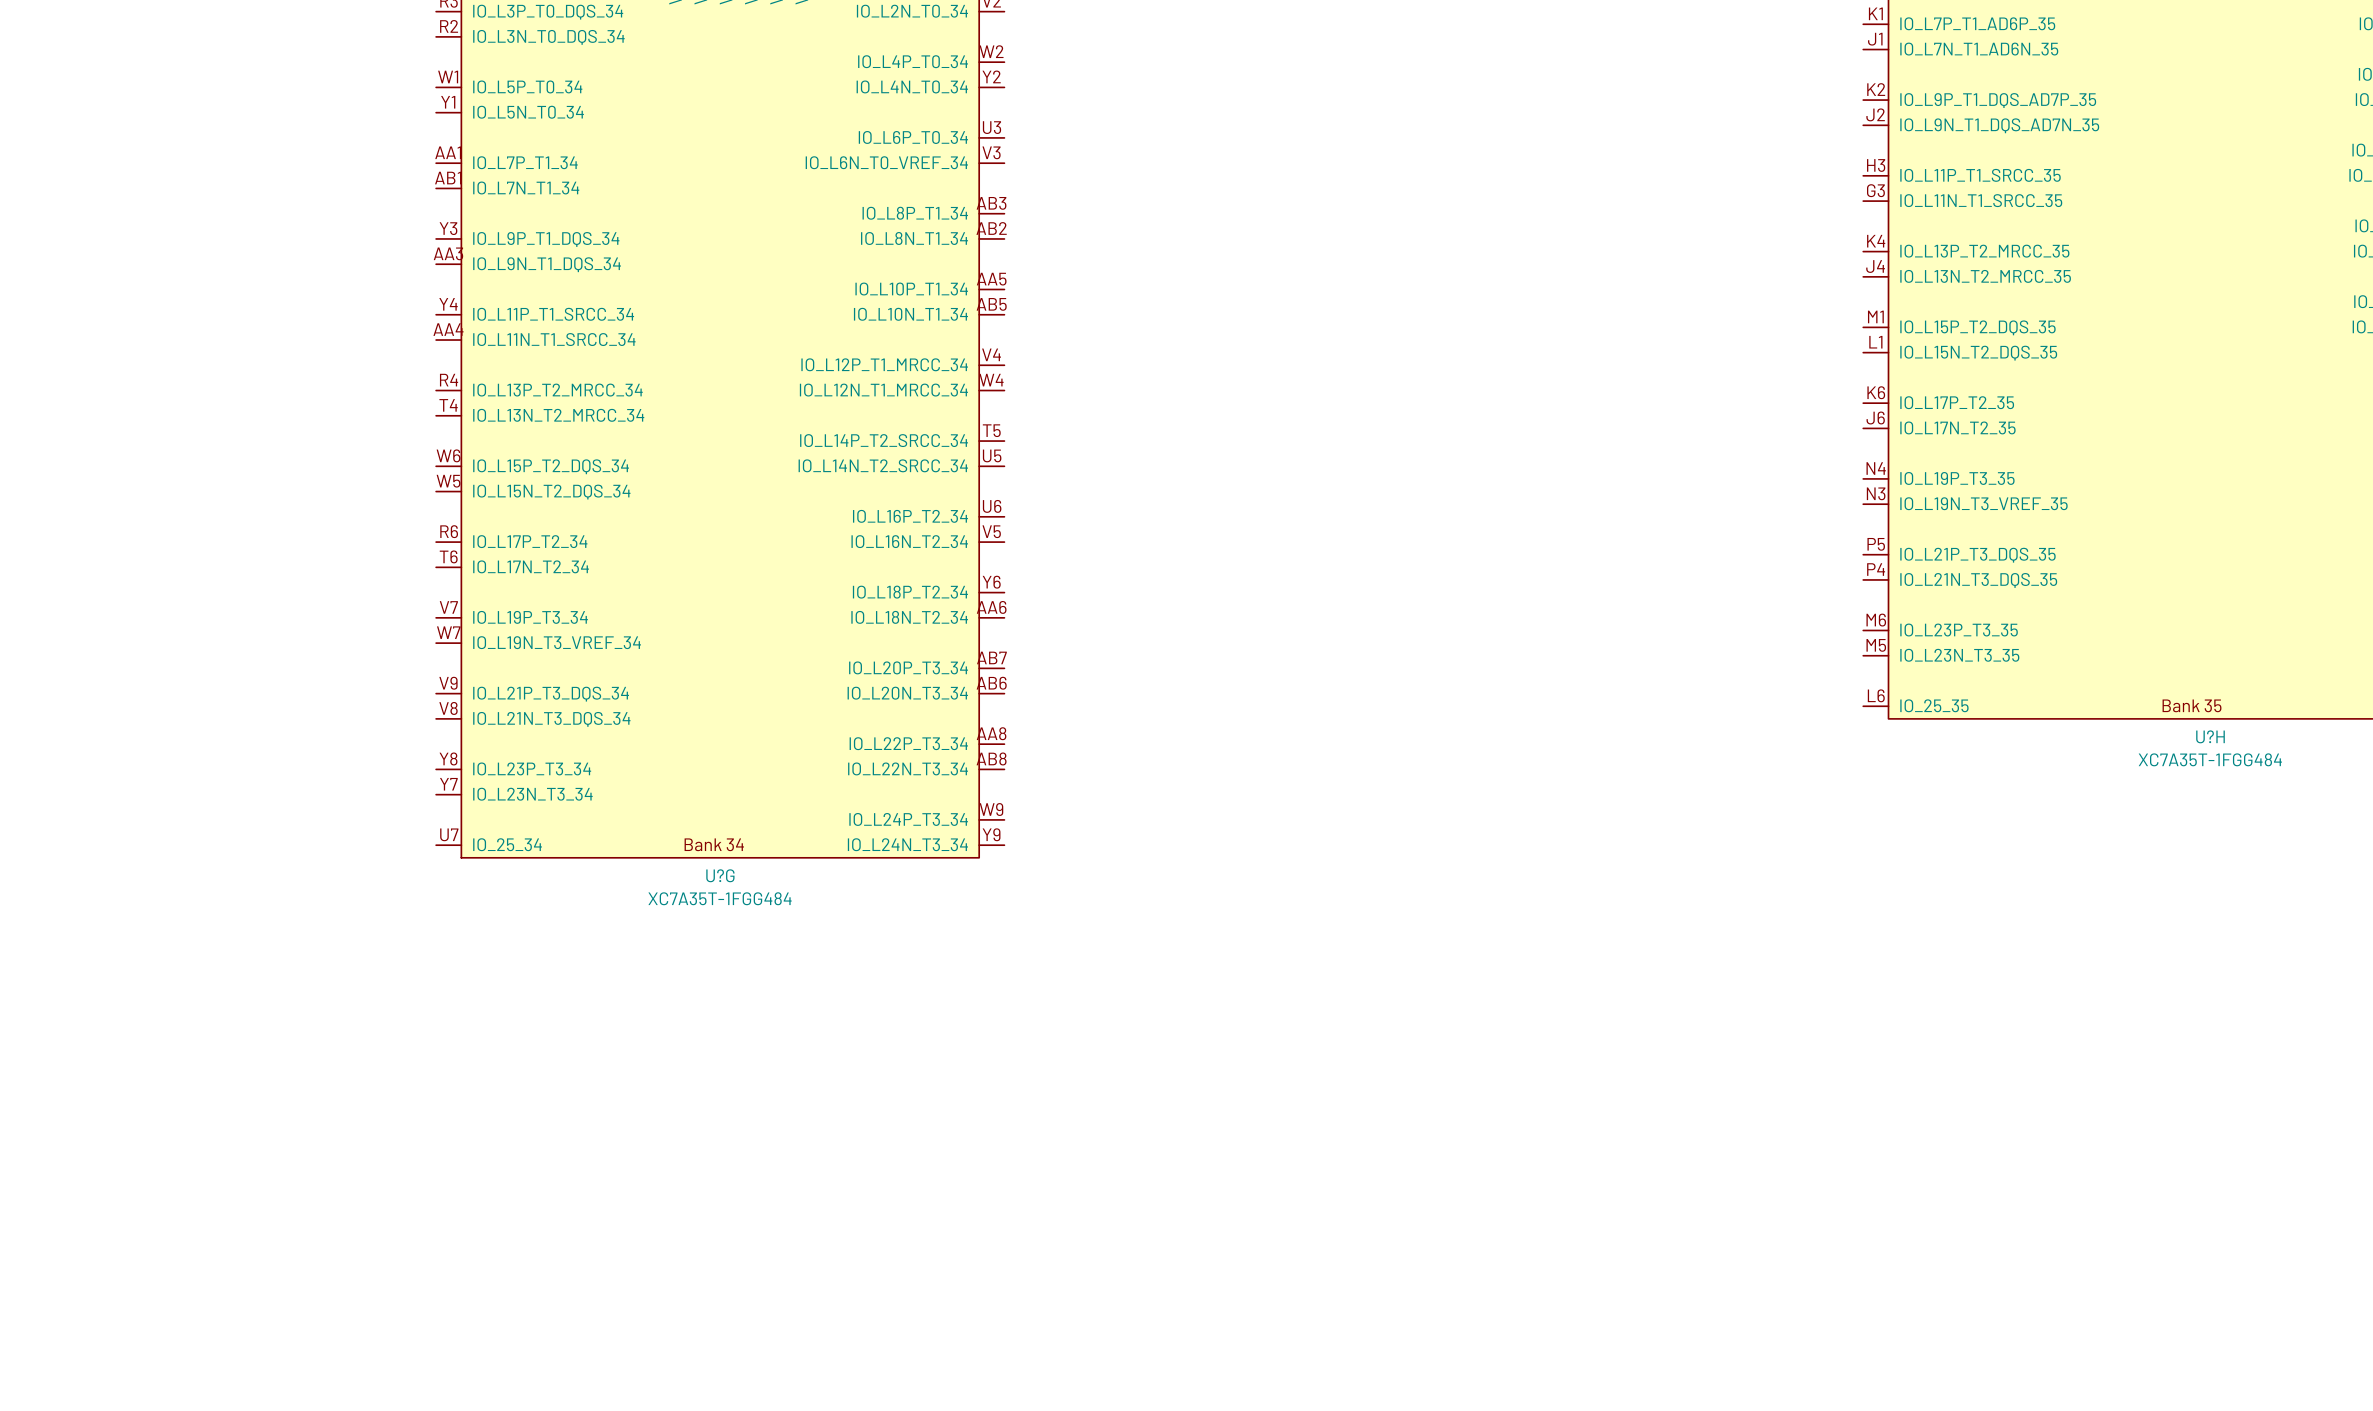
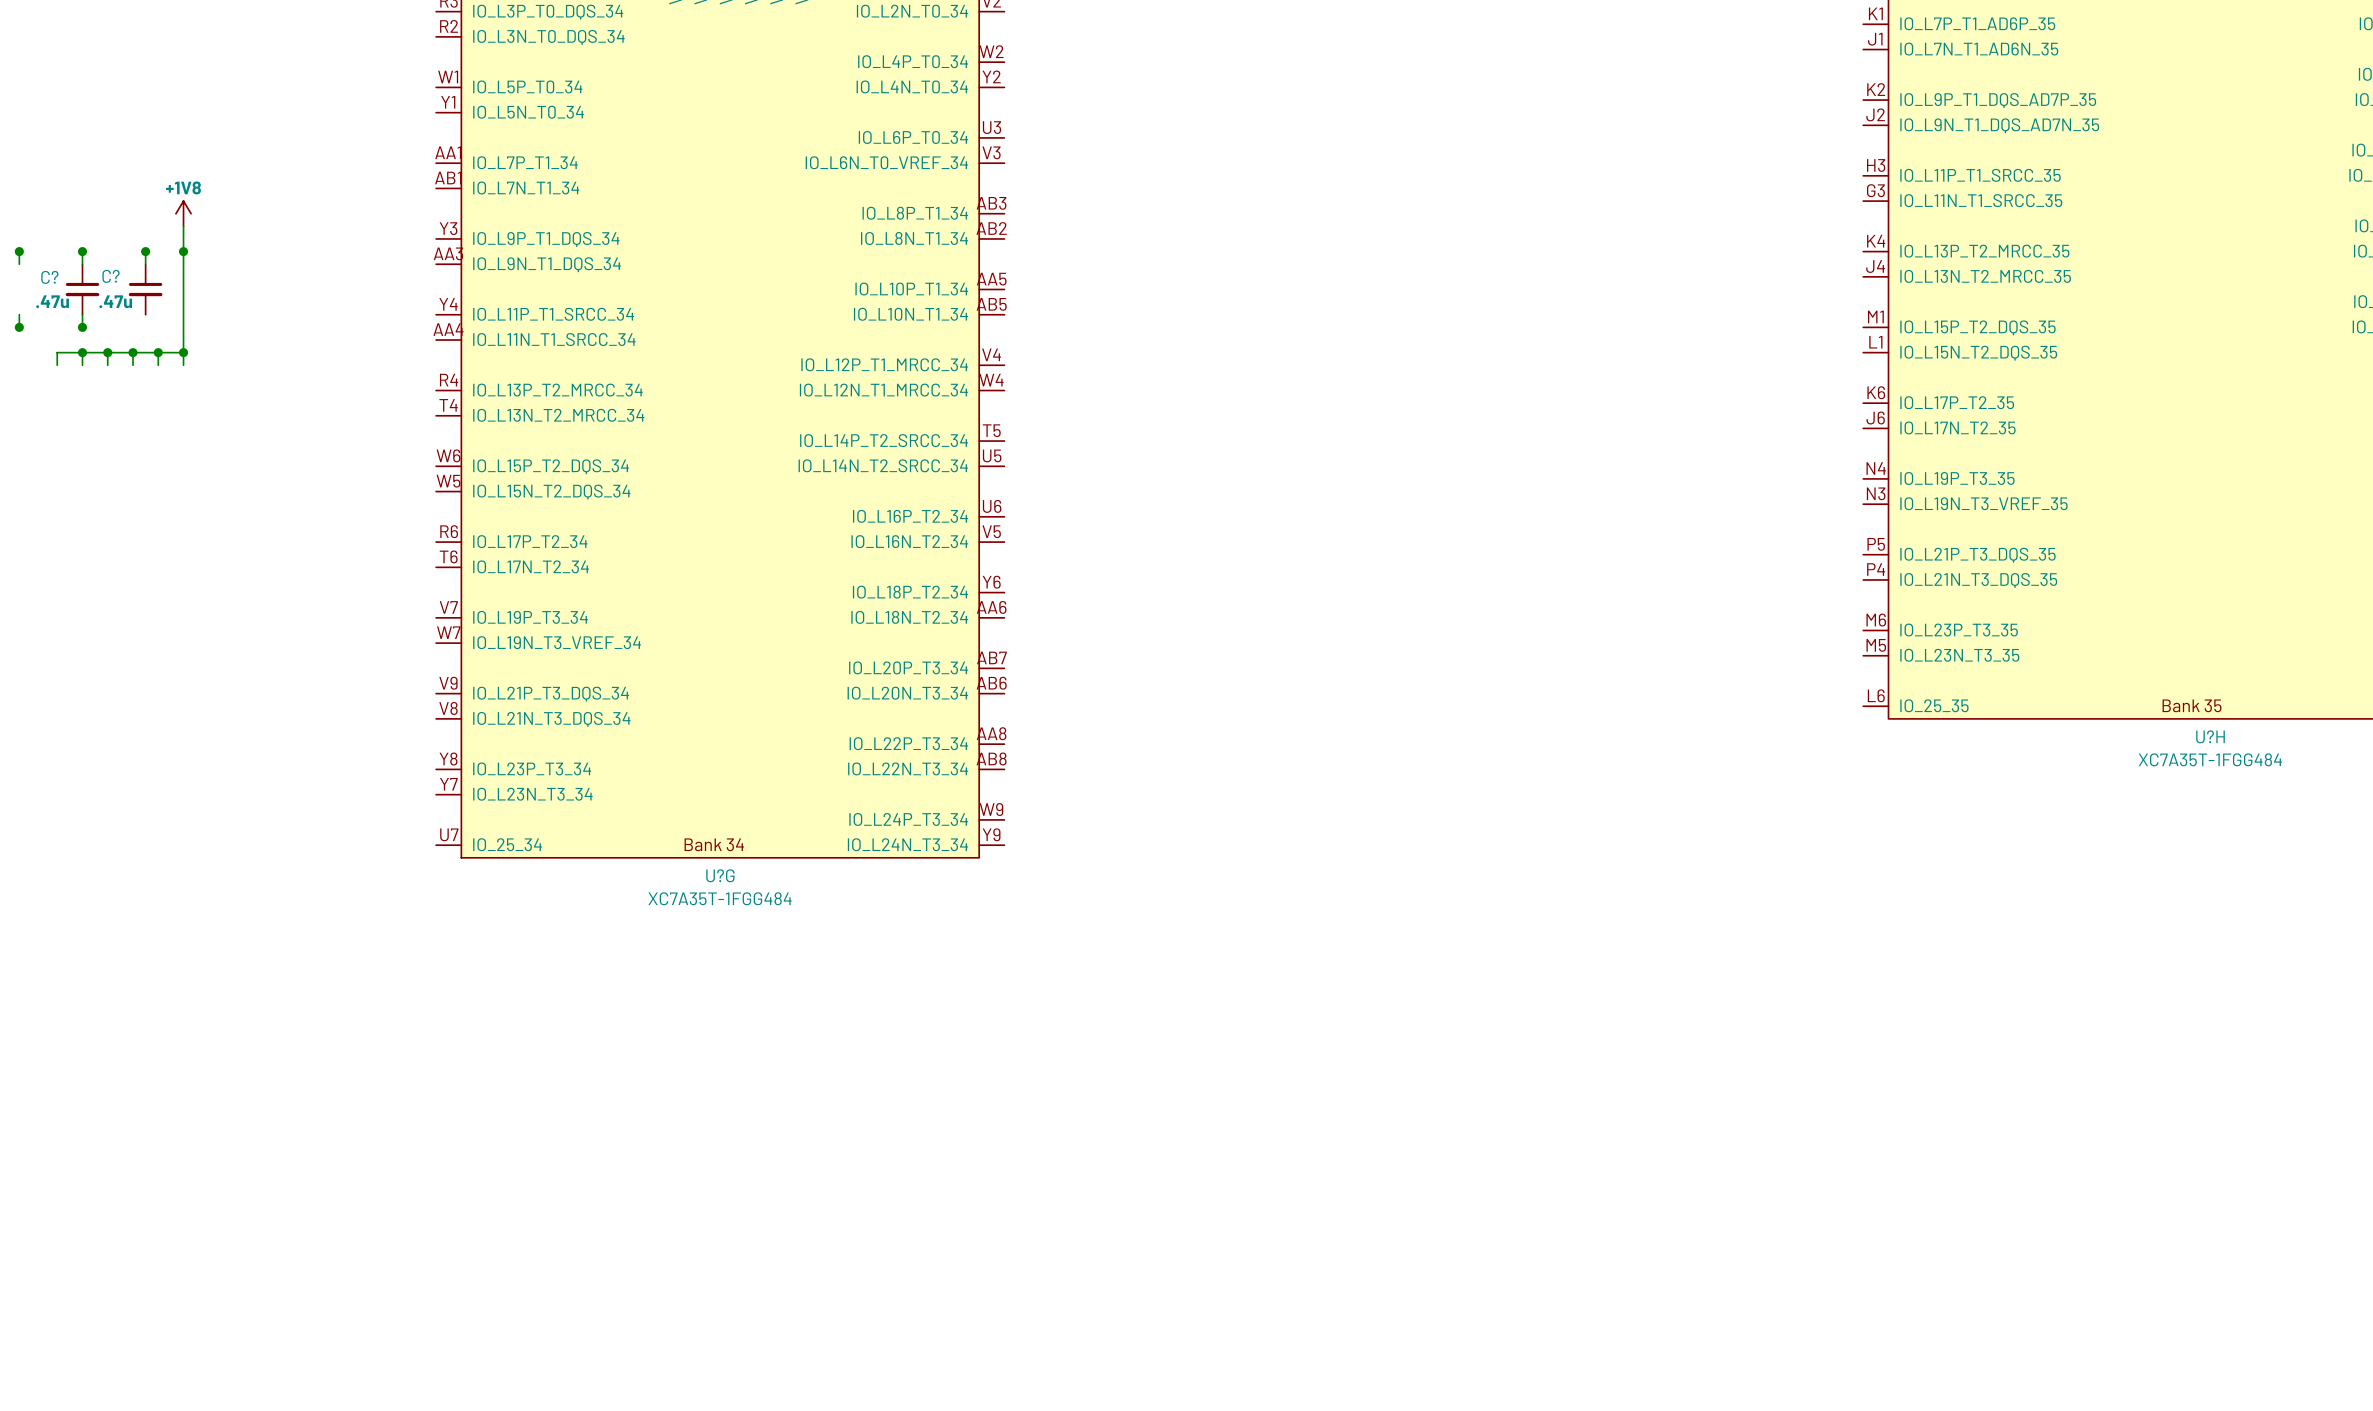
power symbol: none -> +1V8 (183, 213)
wire: none -> (183, 226) (183, 365)
wire: none -> (19, 251) (19, 264)
junction: none -> (19, 251)
wire: none -> (82, 251) (82, 264)
junction: none -> (82, 251)
wire: none -> (145, 251) (145, 264)
junction: none -> (145, 251)
junction: none -> (183, 251)
C?: none -> .47u (82, 289)
C?: none -> .47u (145, 289)
wire: none -> (19, 314) (19, 327)
wire: none -> (82, 314) (82, 327)
junction: none -> (19, 327)
junction: none -> (82, 327)
wire: none -> (82, 352) (82, 365)
junction: none -> (82, 352)
wire: none -> (107, 352) (107, 365)
junction: none -> (107, 352)
wire: none -> (133, 352) (133, 365)
junction: none -> (133, 352)
wire: none -> (158, 352) (158, 365)
junction: none -> (158, 352)
wire: none -> (183, 352) (57, 352) (57, 365)
junction: none -> (183, 352)

